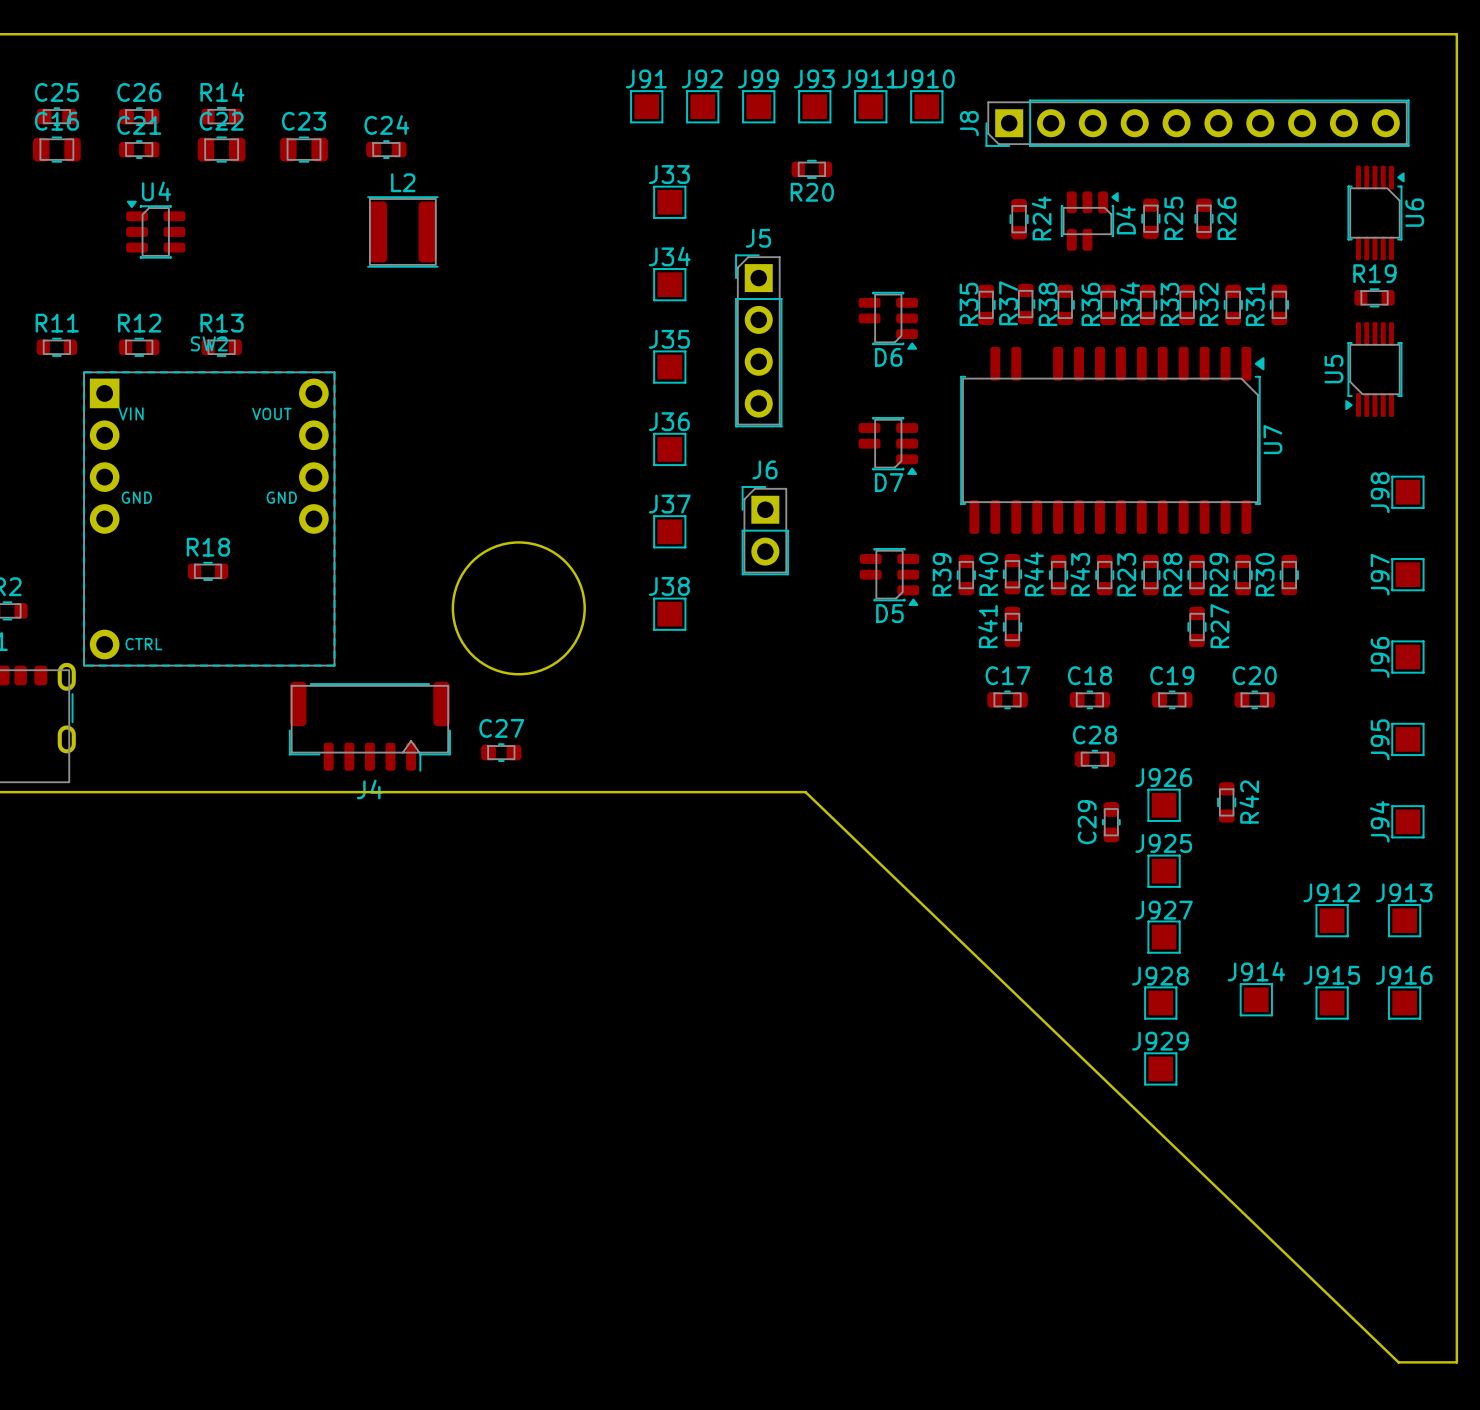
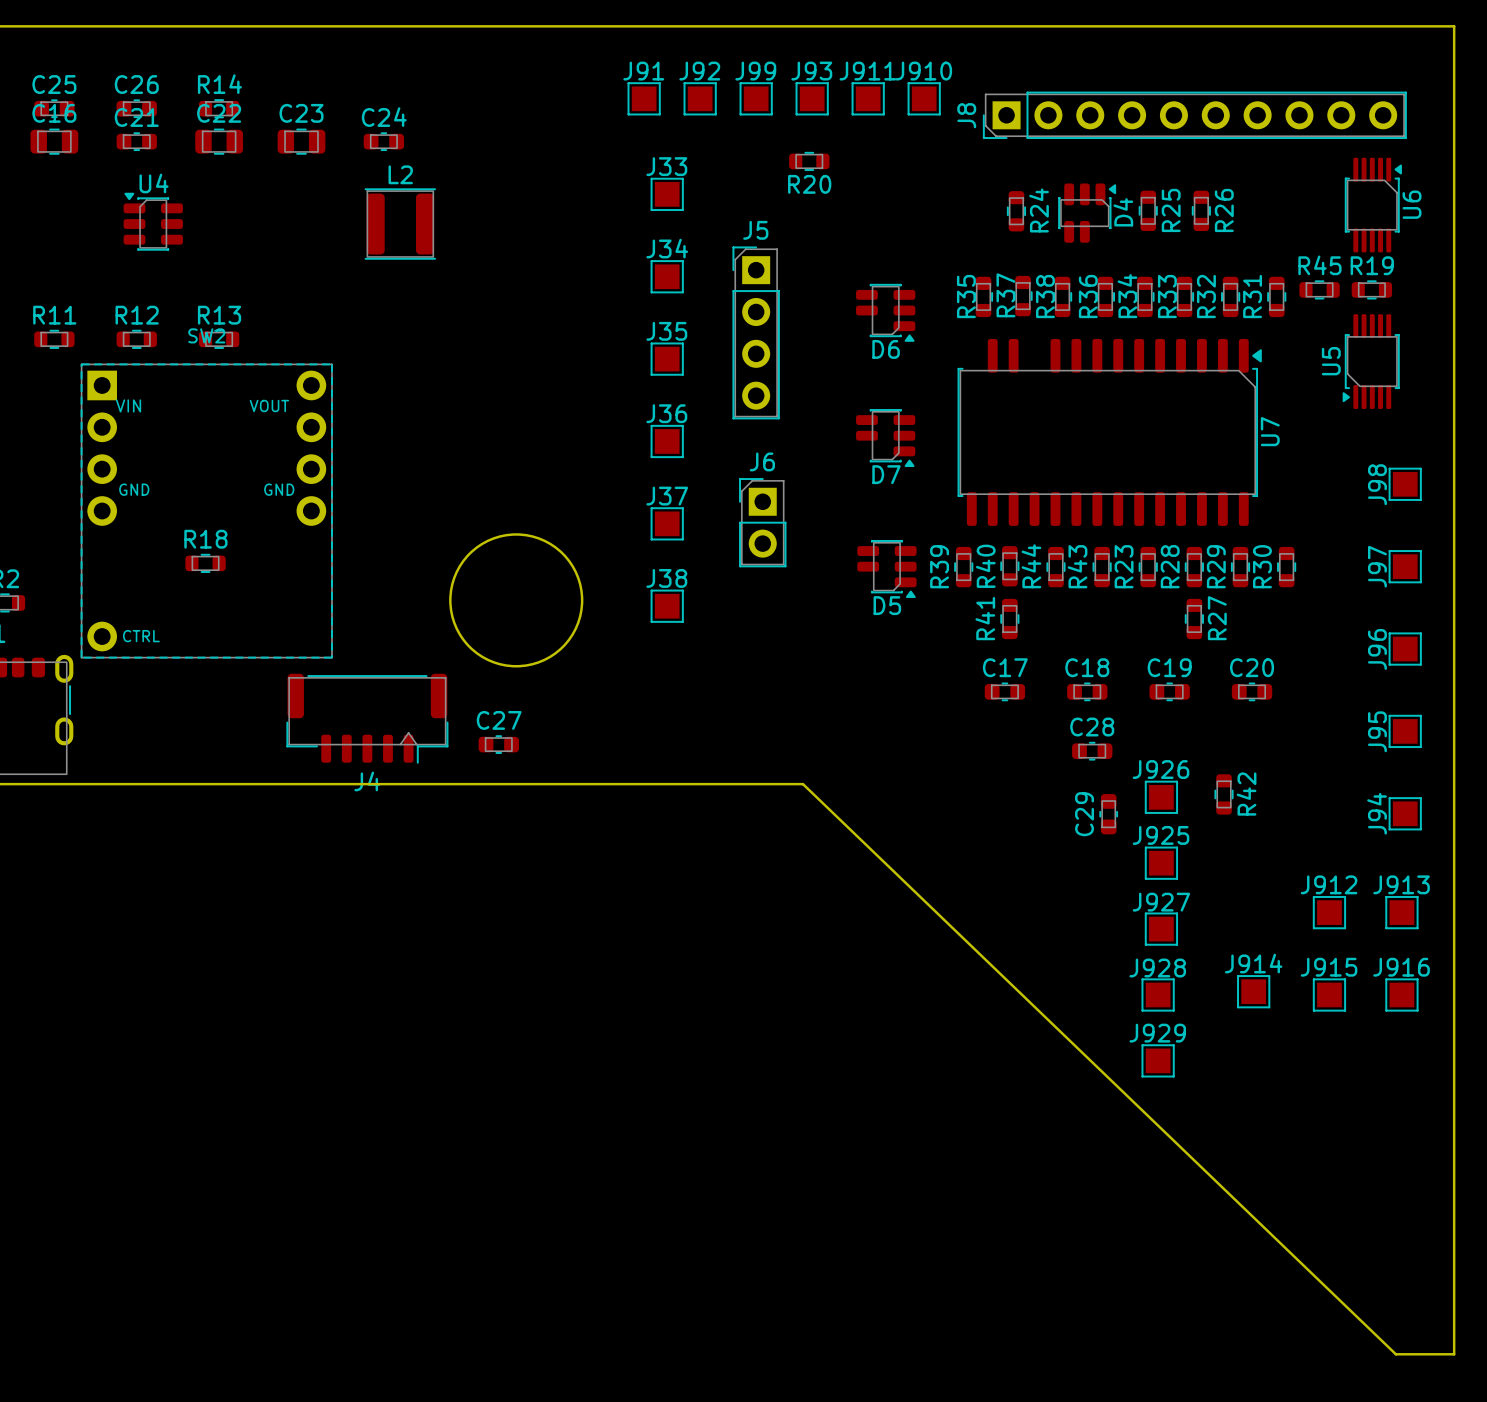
R45: none -> (1319, 289)

